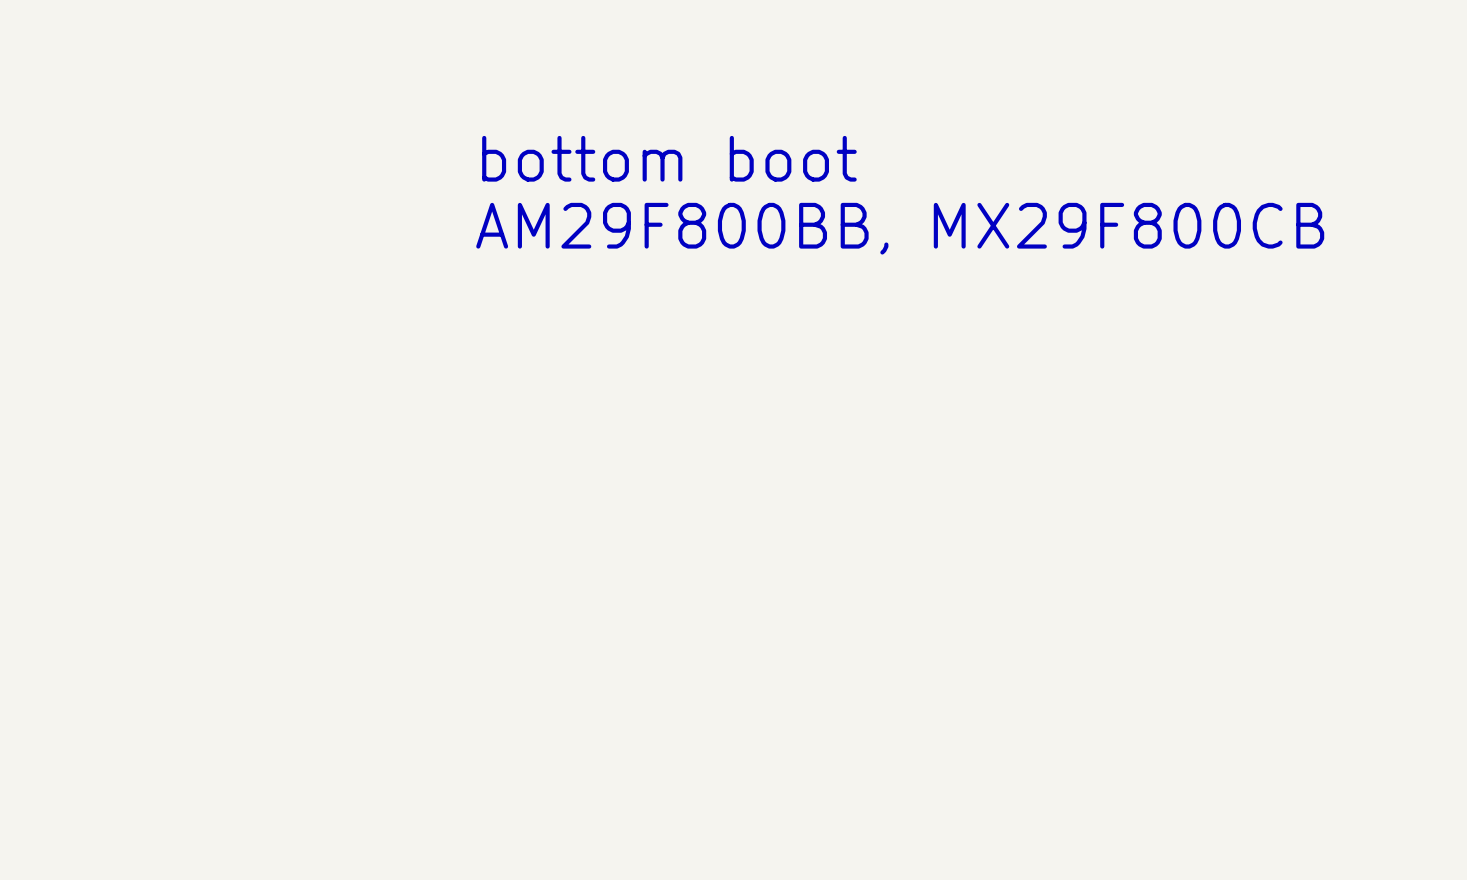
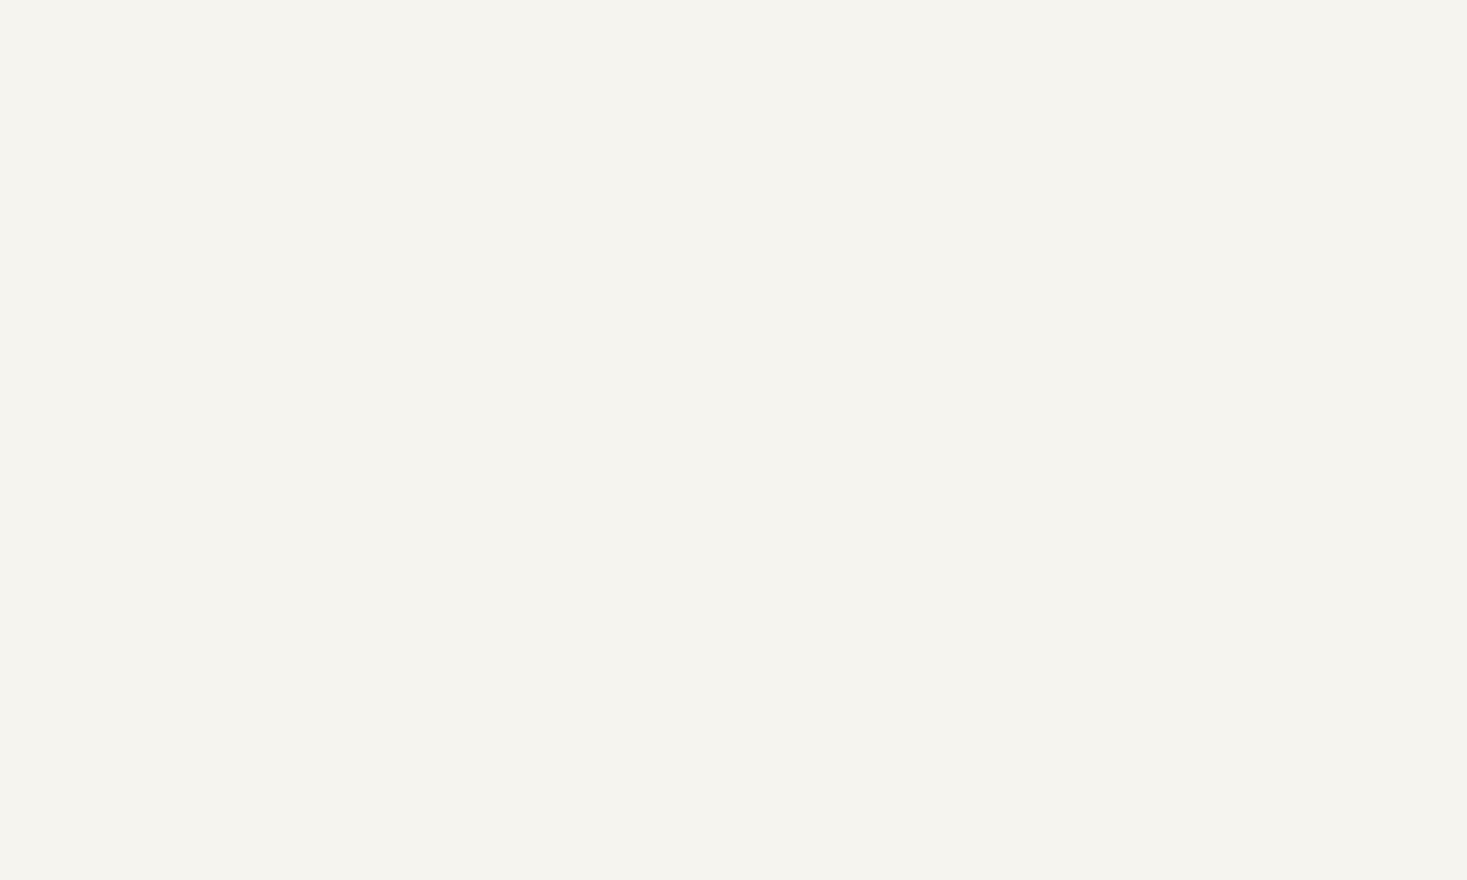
text: bottom boot (669, 158) -> none
text: AM29F800BB, MX29F800CB (900, 228) -> none

